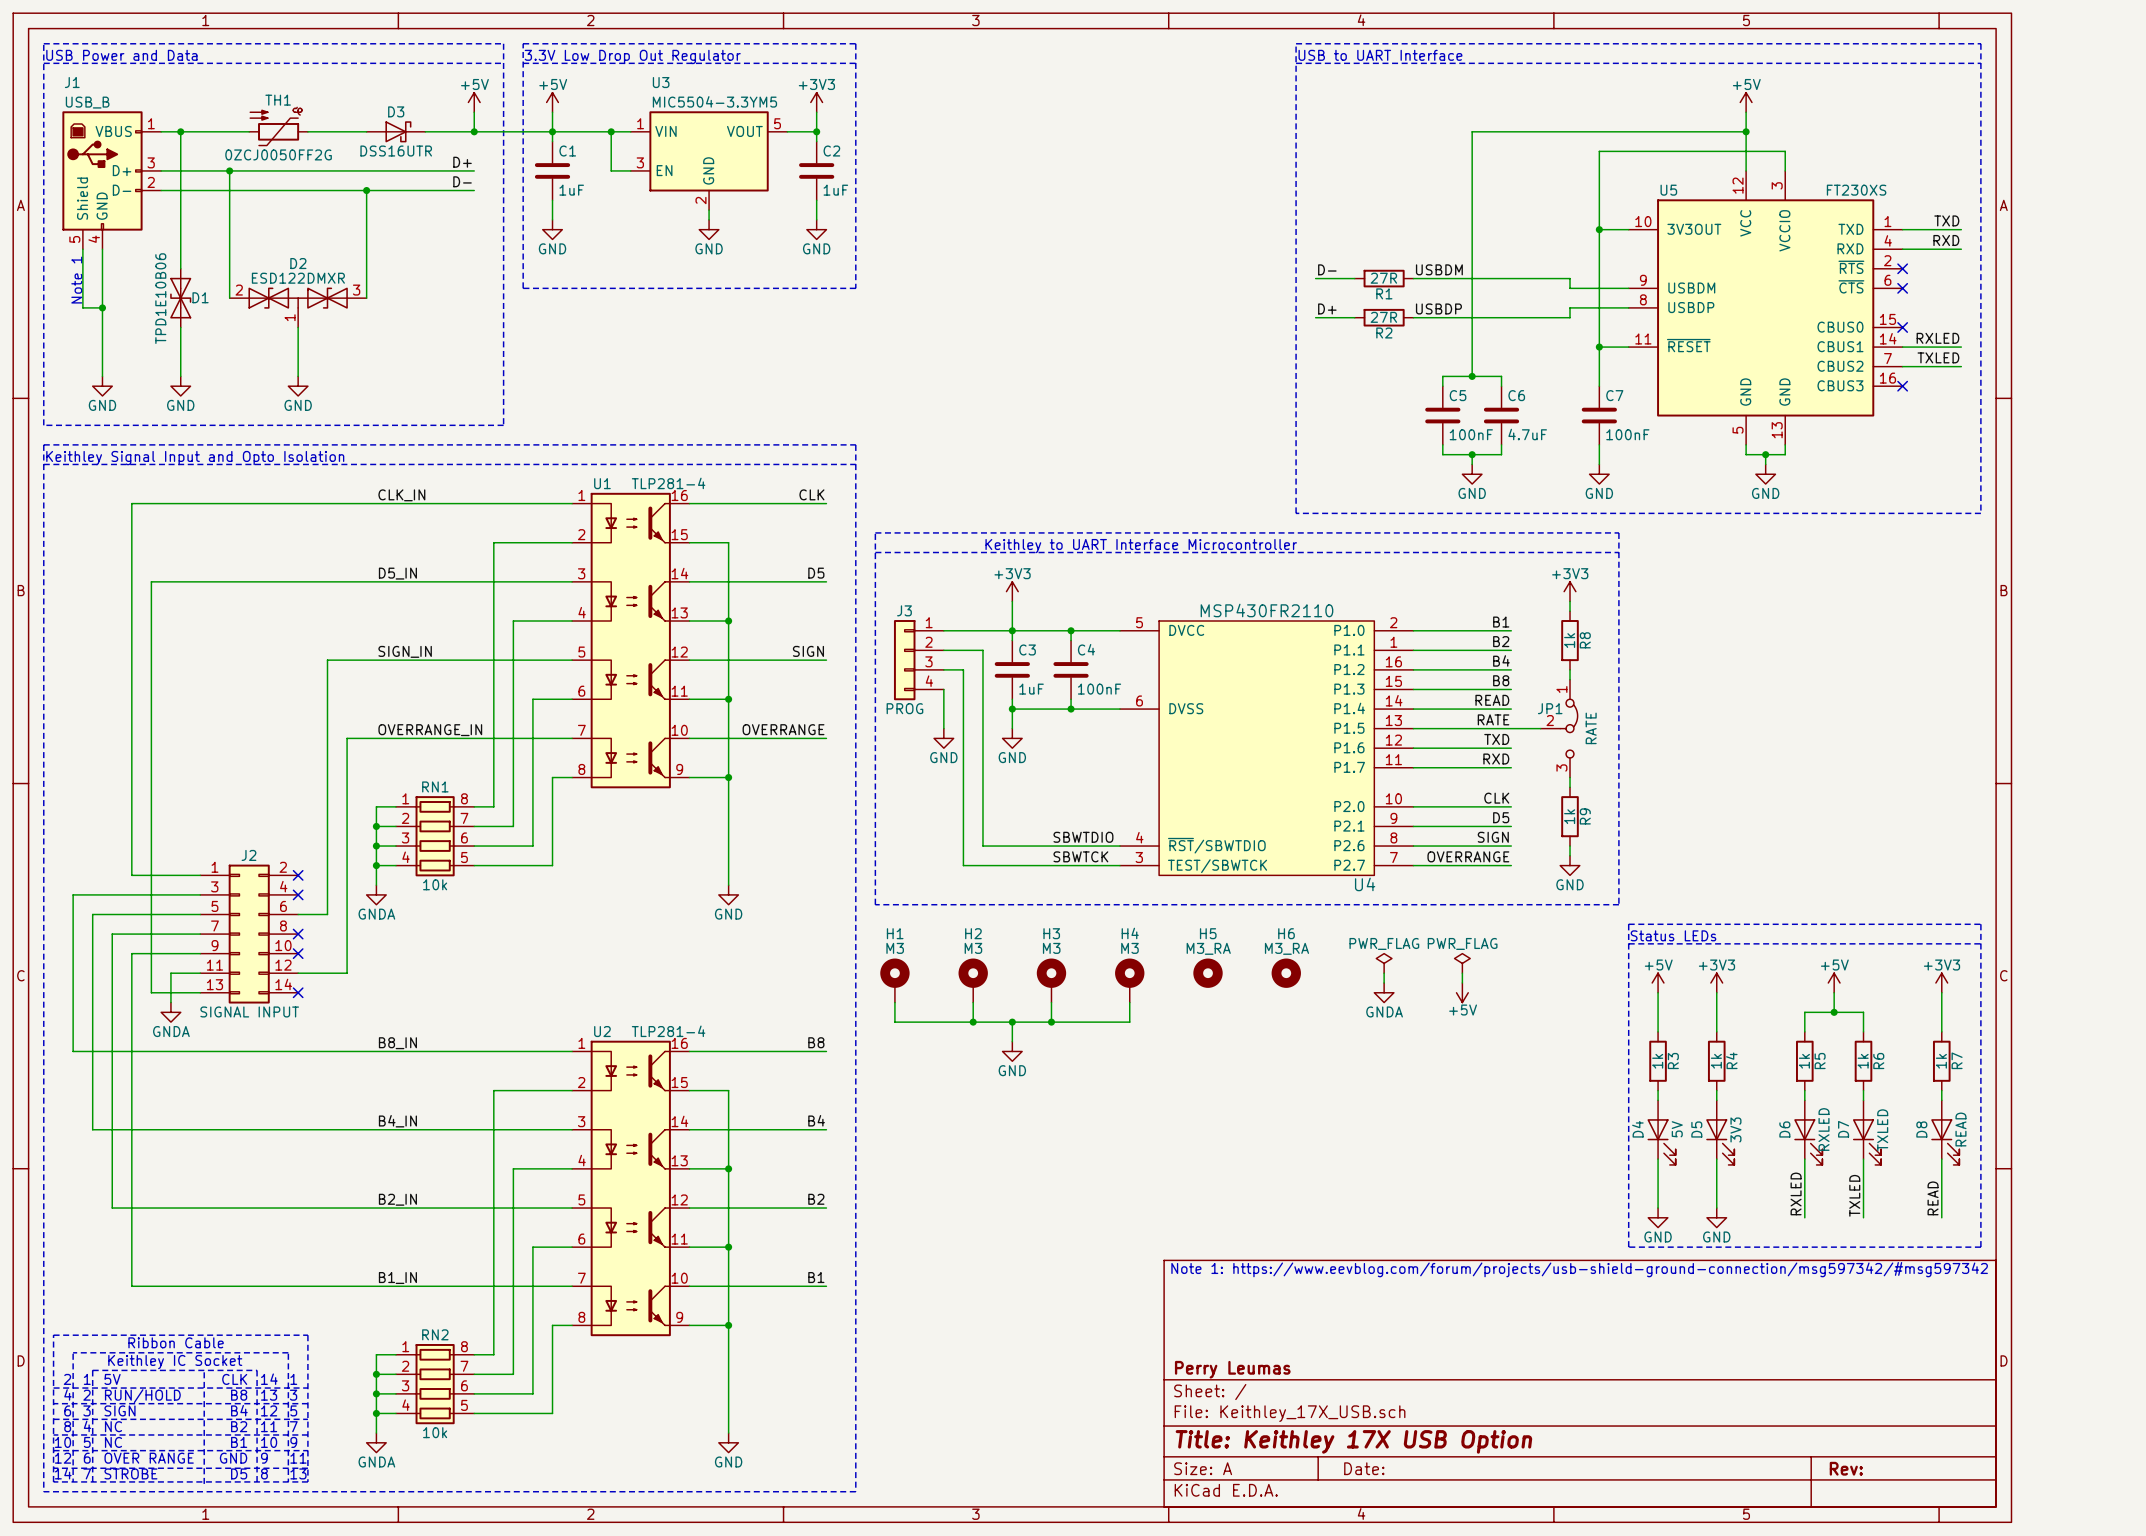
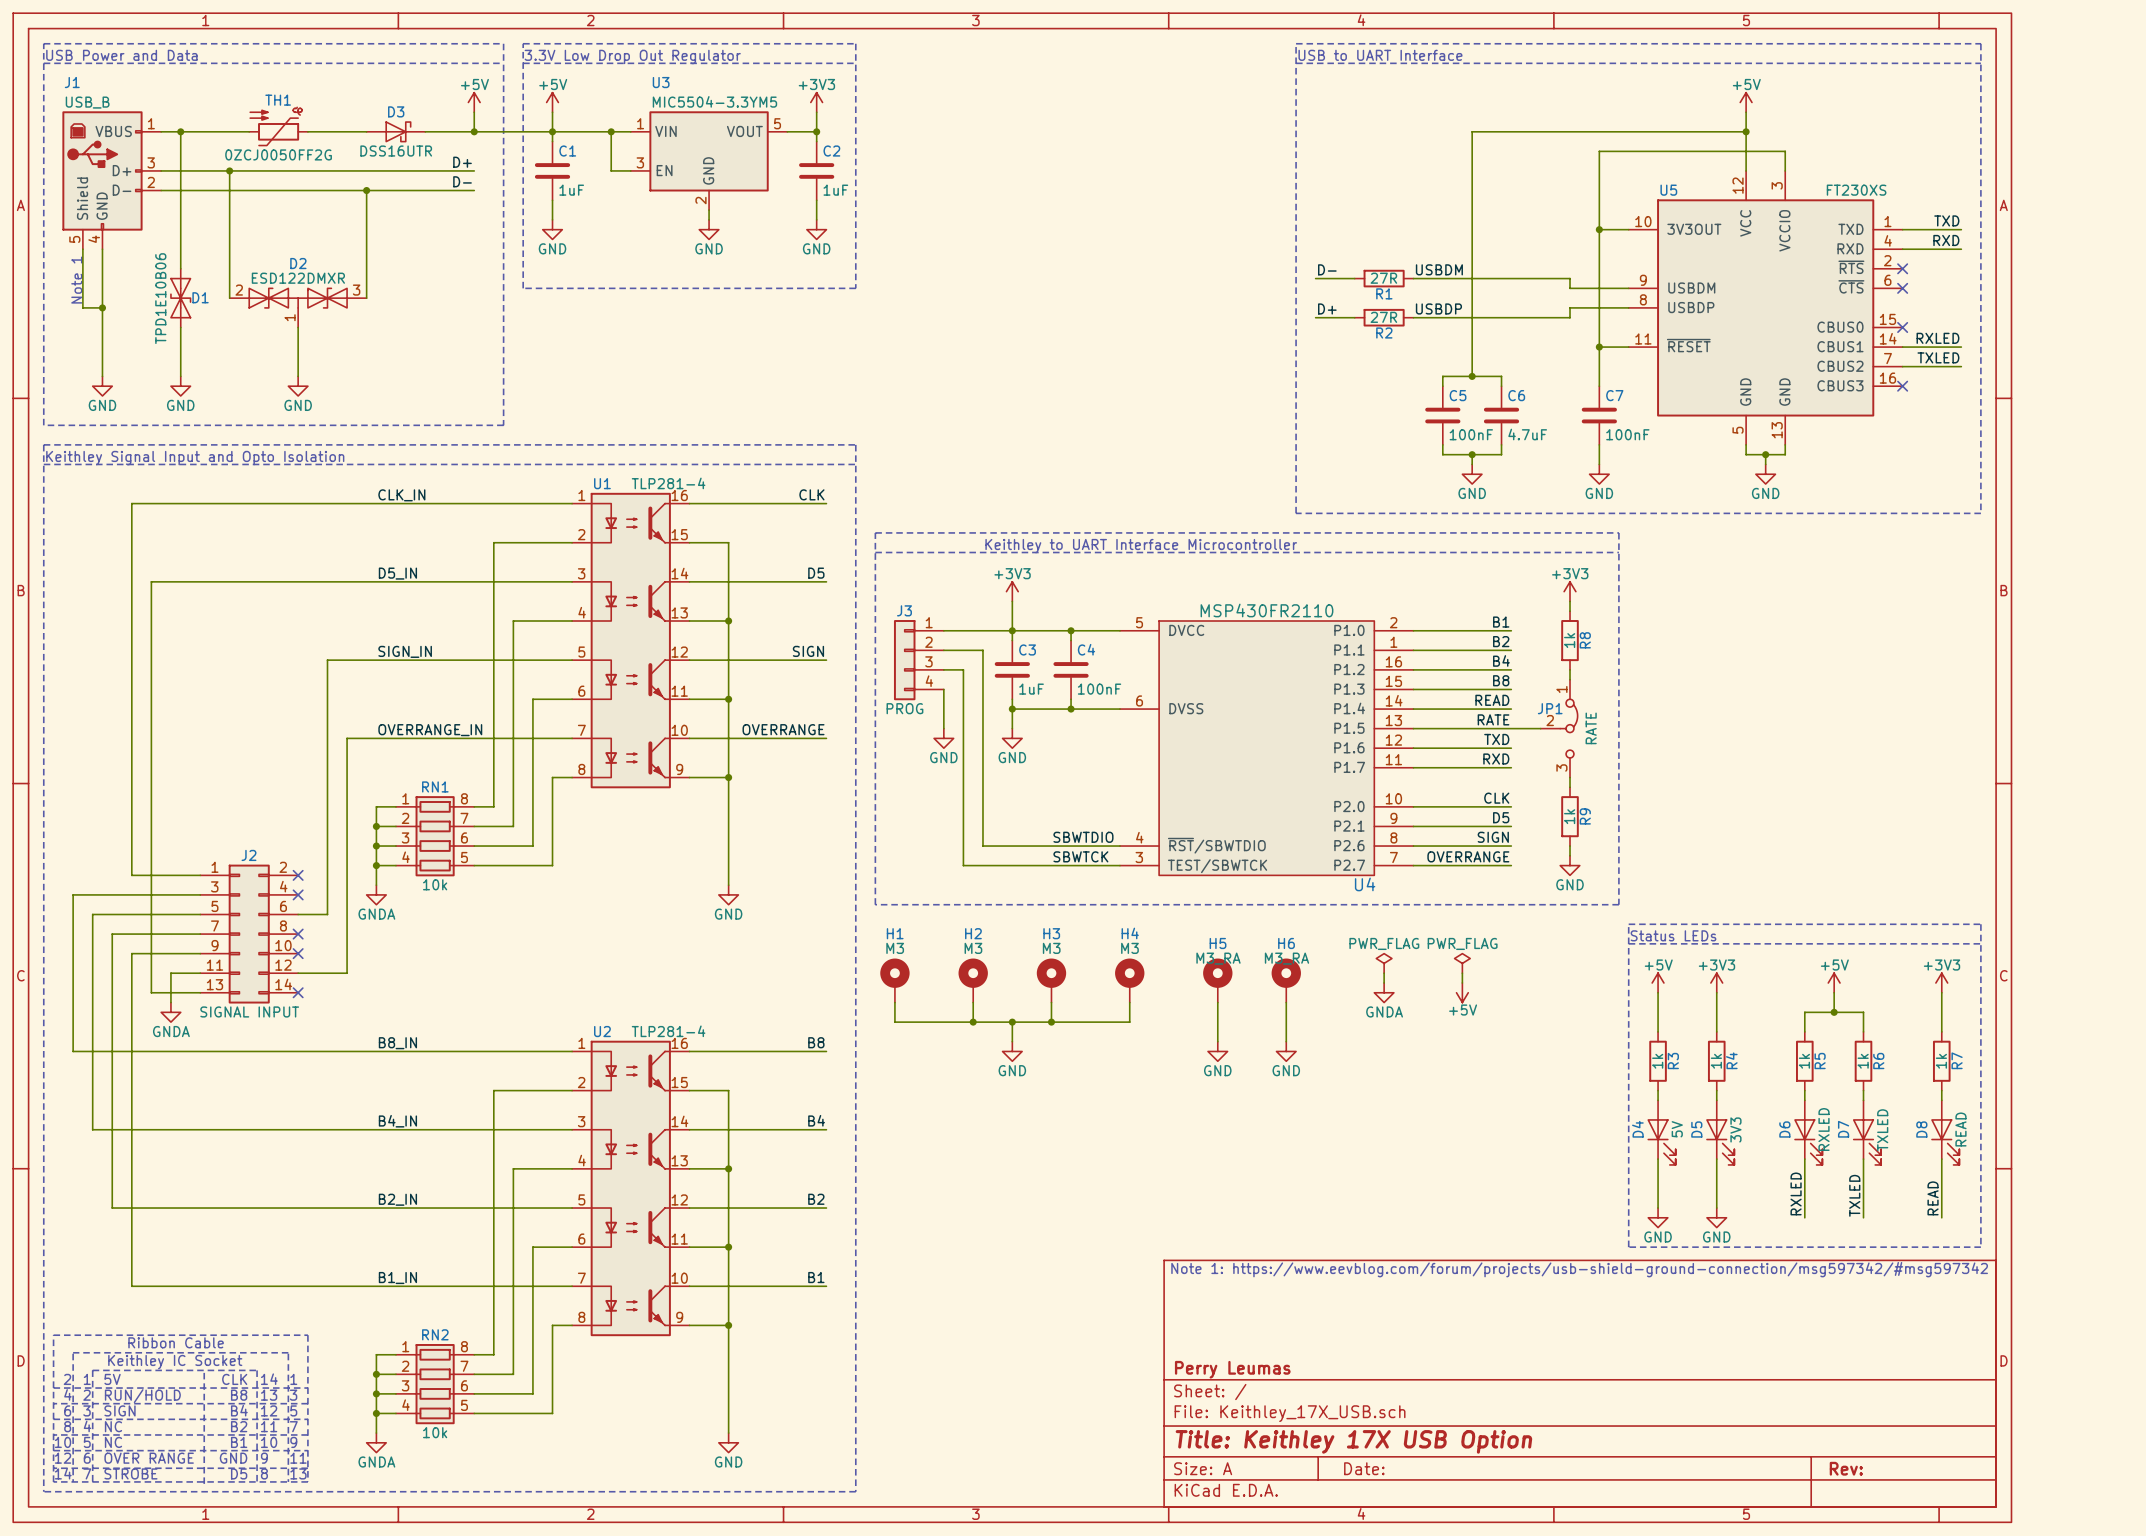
H5 symbol: [1193, 958, 1223, 988] -> [1203, 958, 1233, 1003]
H6 symbol: [1271, 958, 1301, 988] -> [1271, 958, 1301, 1003]
wire: none -> (1217, 1002) (1217, 1041)
wire: none -> (1286, 1002) (1286, 1041)
power symbol: none -> GND (1217, 1051)
power symbol: none -> GND (1286, 1051)

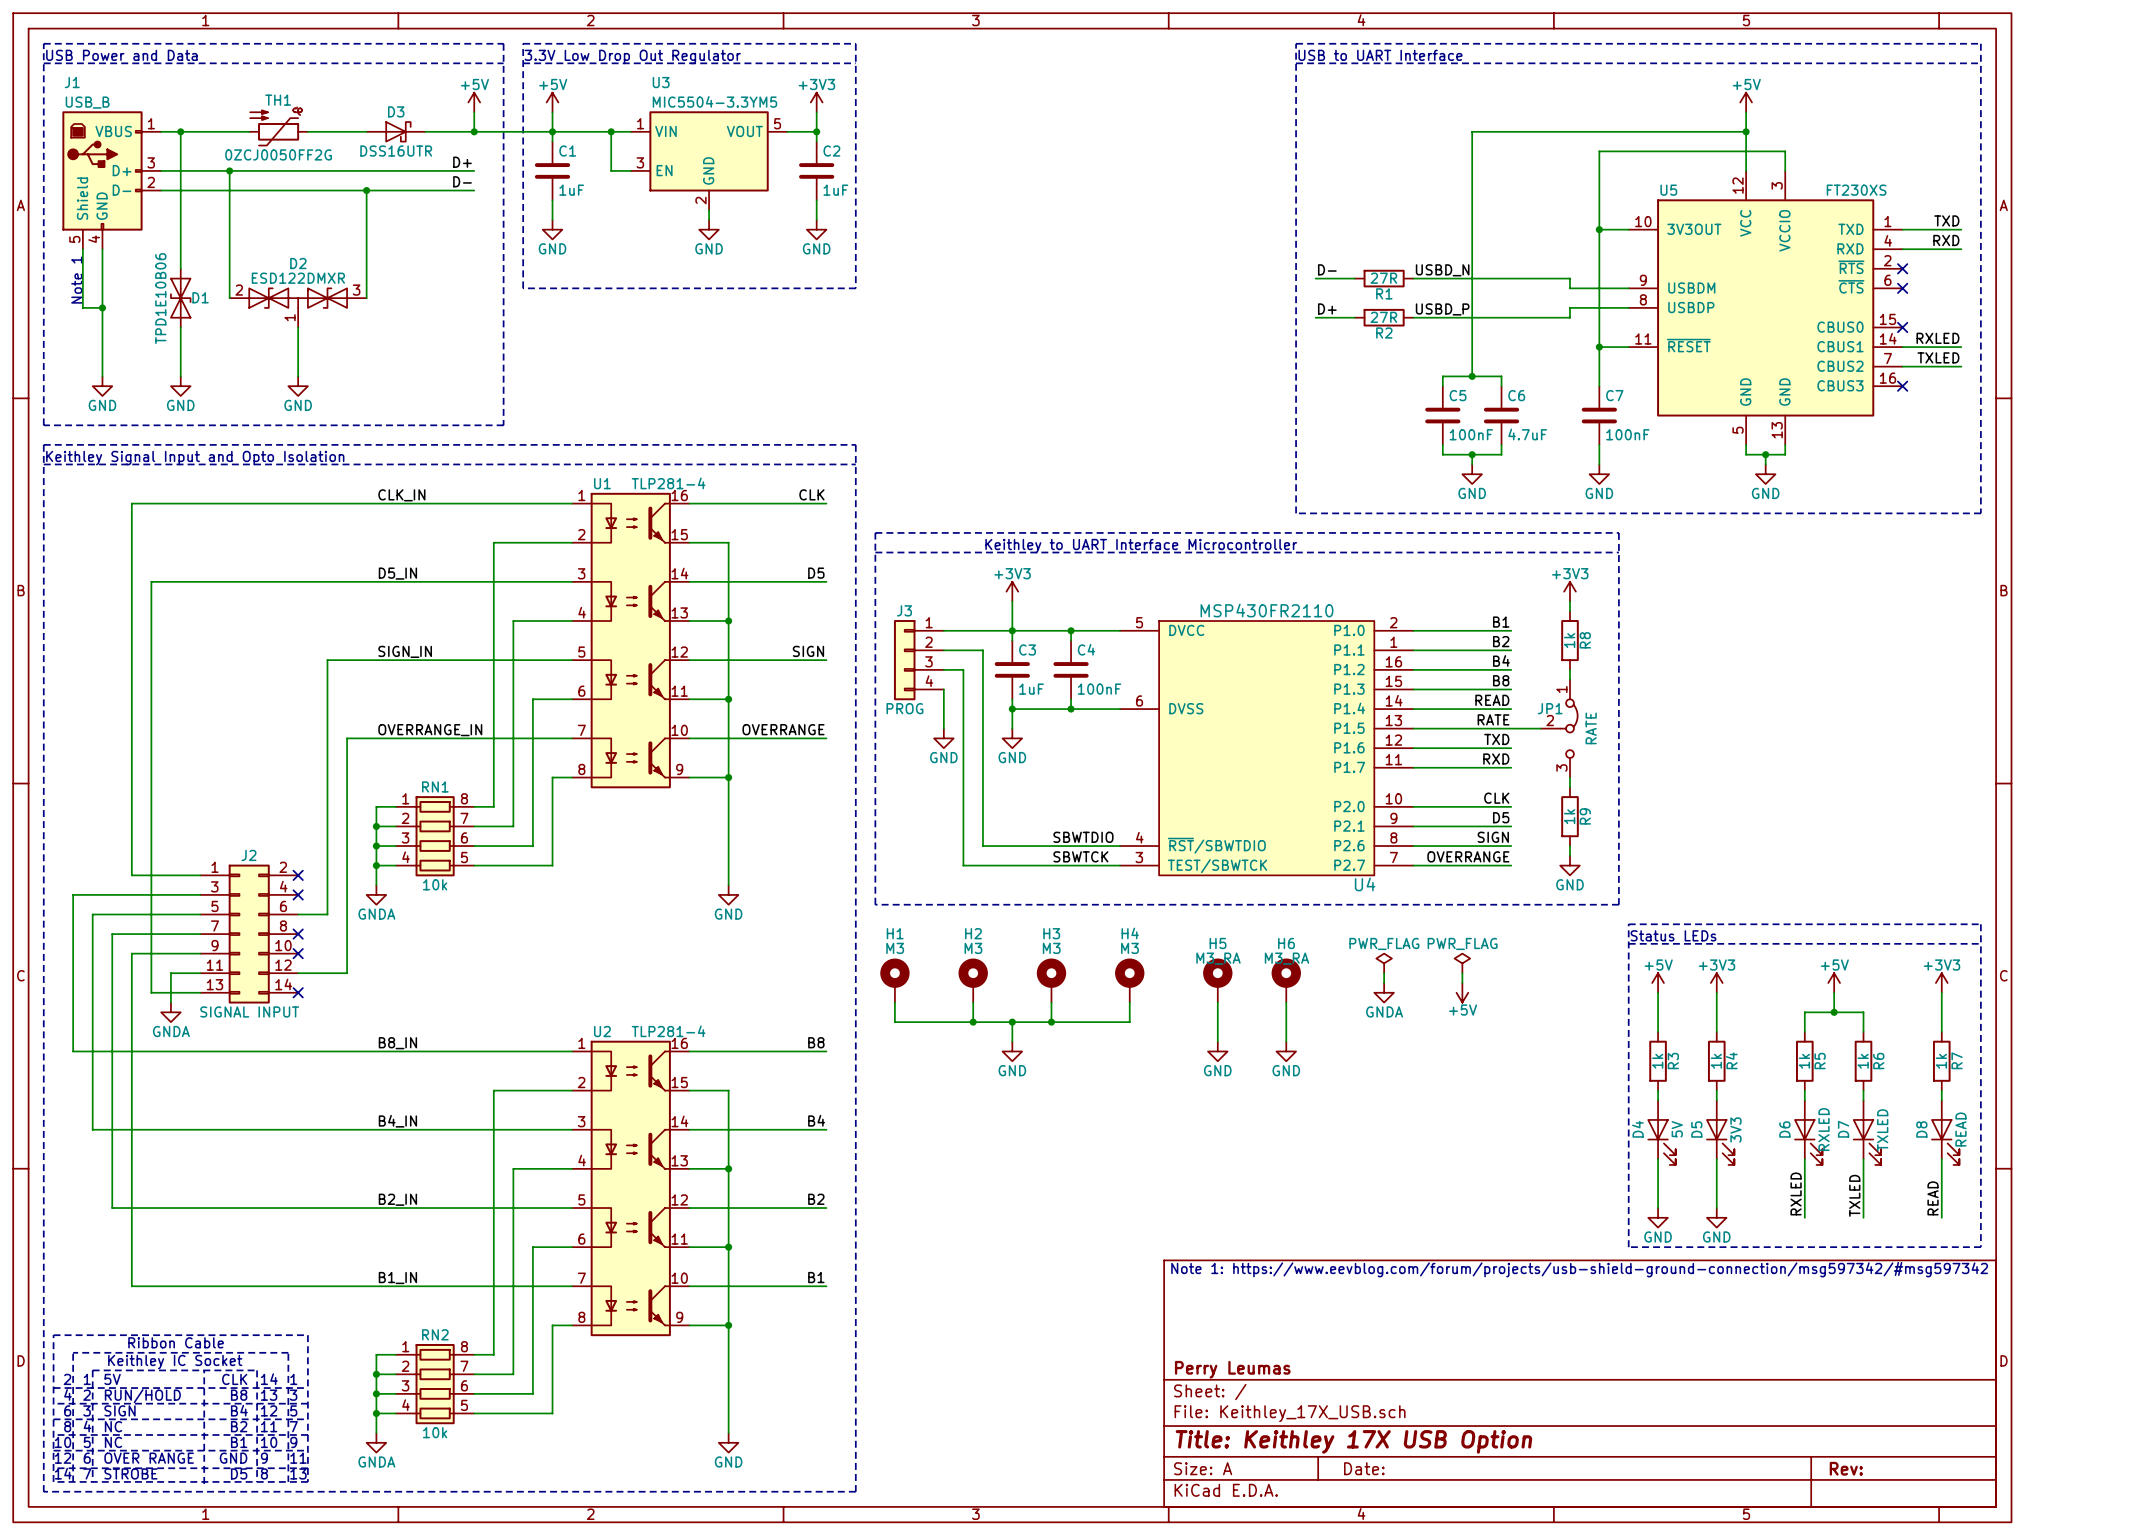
label: USBDM (1439, 269) -> USBD_N (1442, 270)
label: USBDP (1438, 308) -> USBD_P (1442, 309)

